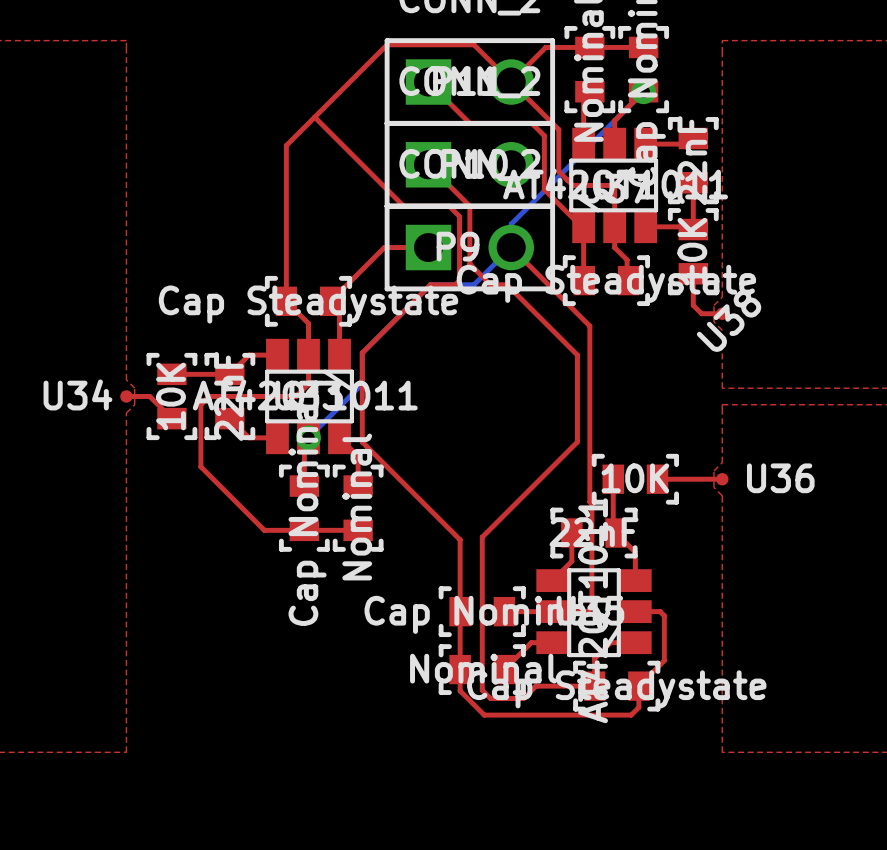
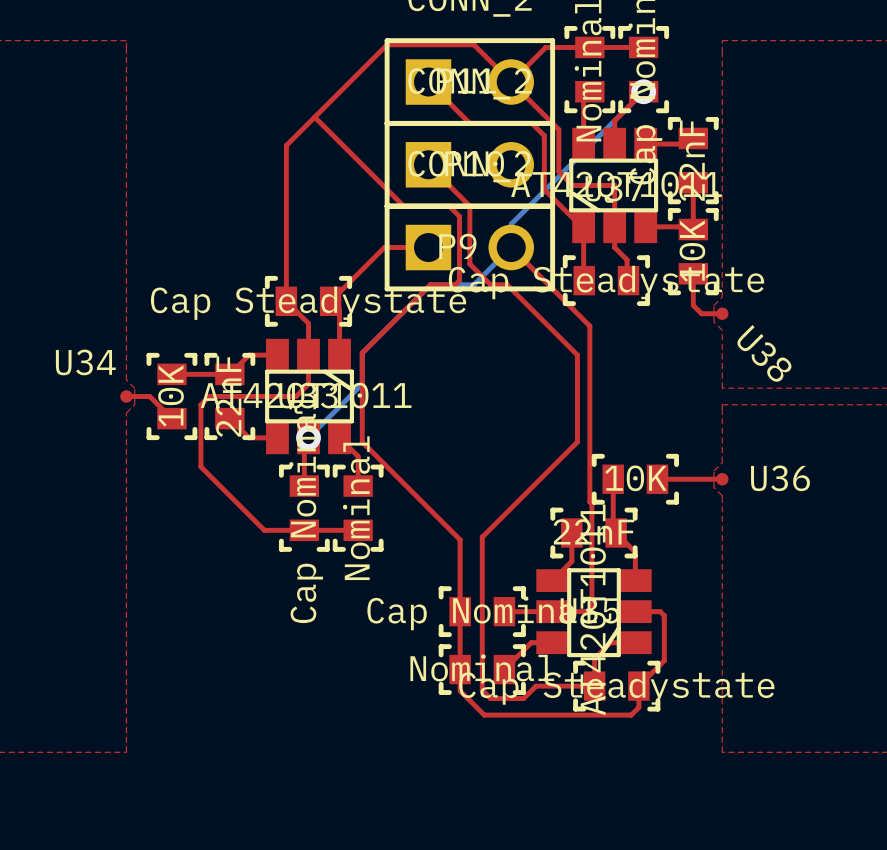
U38 name rotation: 0° (729, 320) -> 90° clockwise (764, 353)
U34 name position: U34 (77, 394) -> U34 (85, 362)

